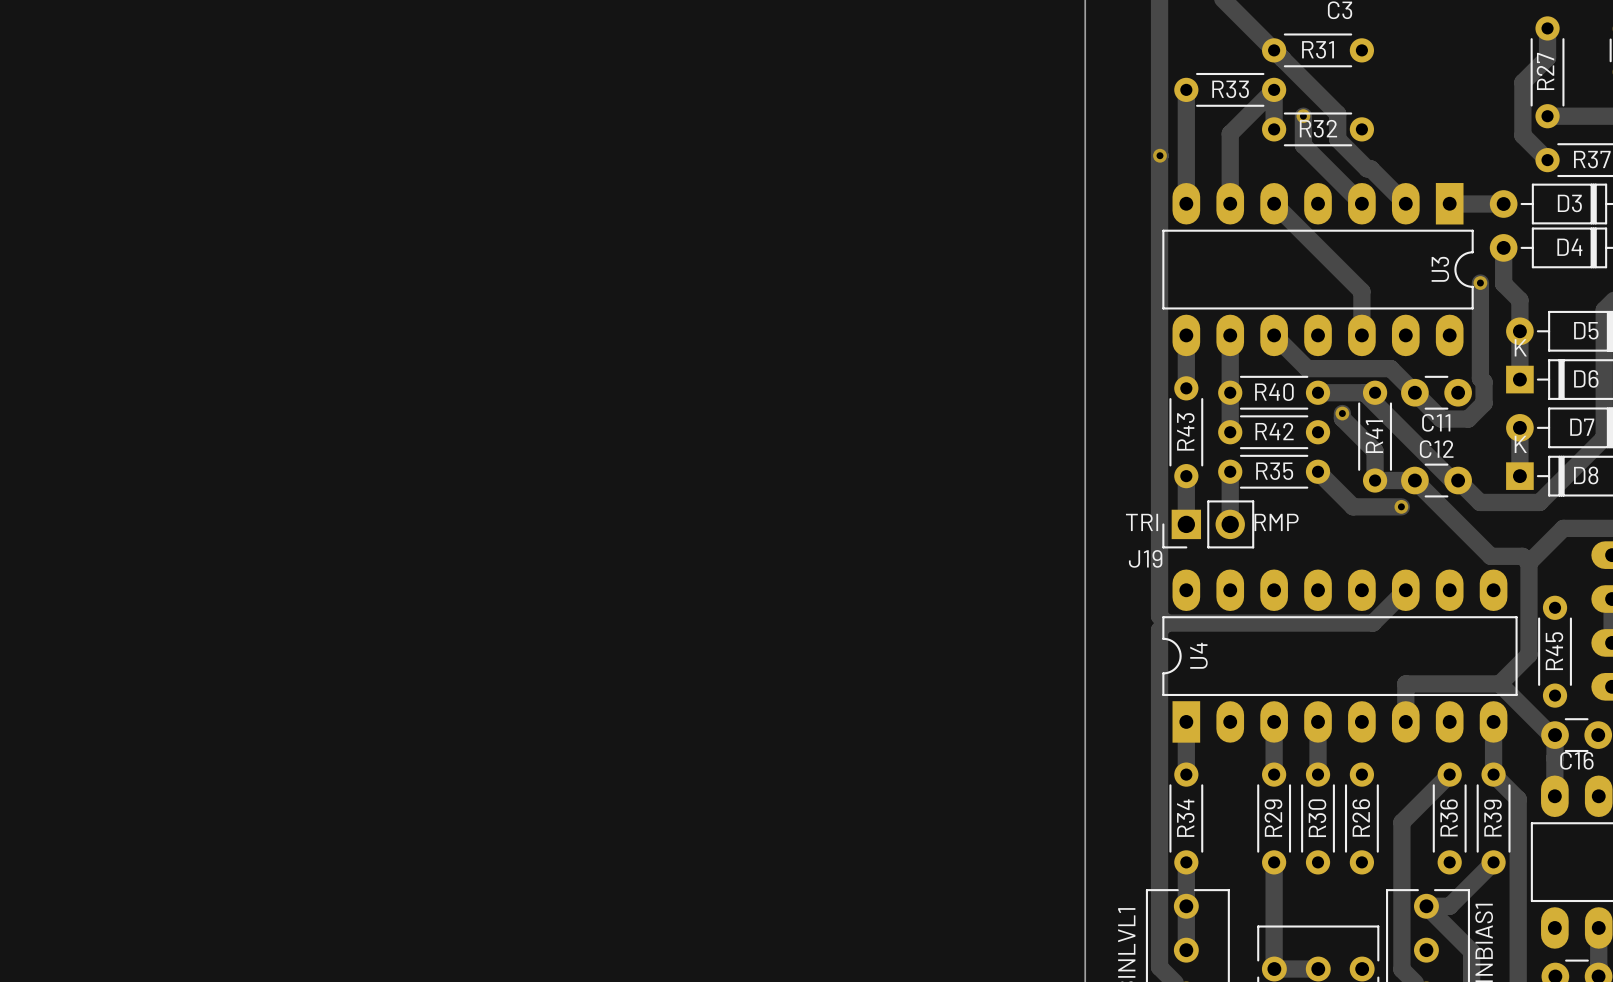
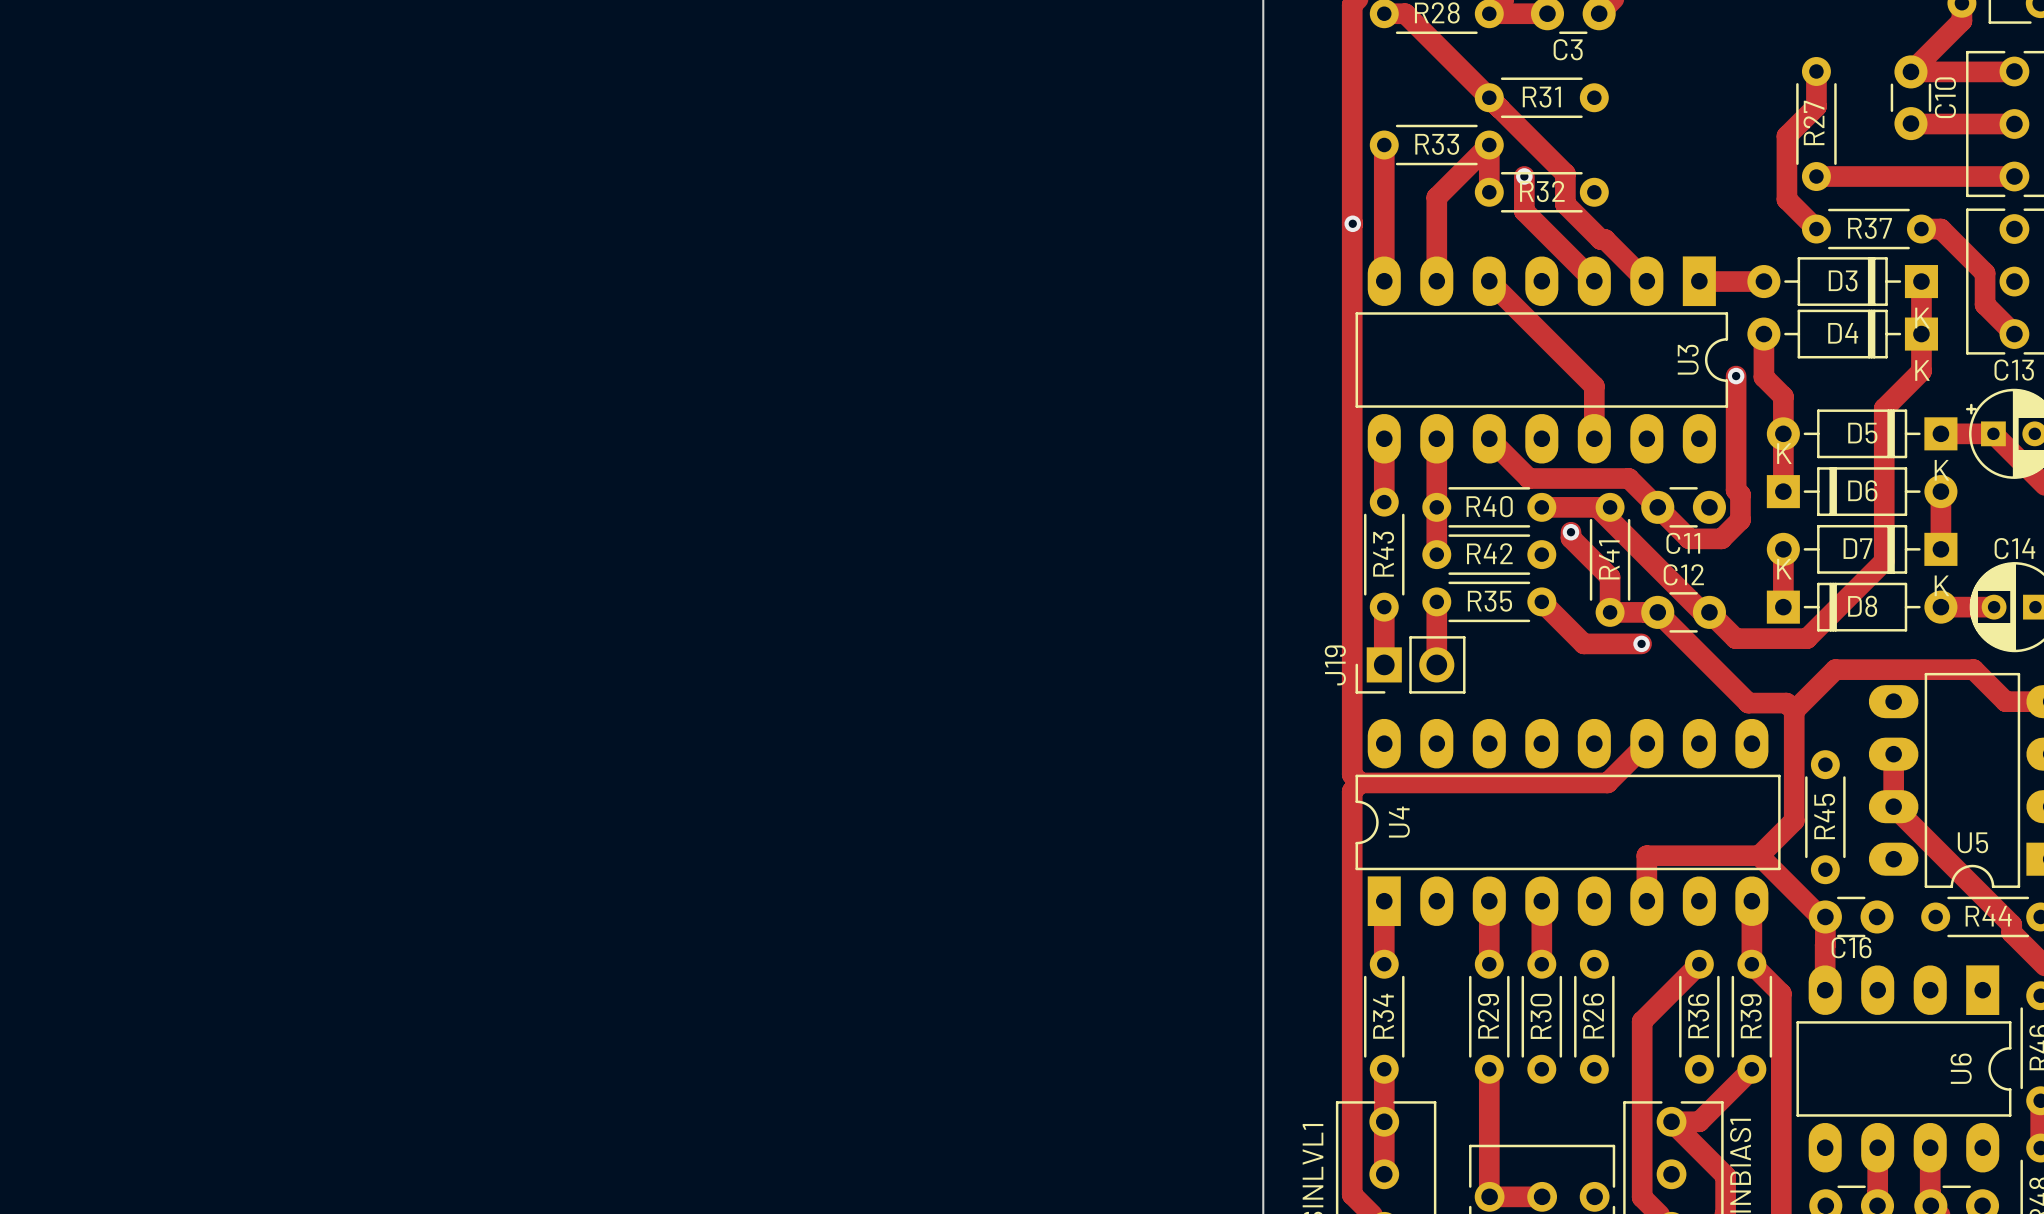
text: TRI (1142, 522) -> none
text: RMP (1276, 522) -> none
J19 name rotation: 0° (1145, 558) -> 90° counterclockwise (1335, 665)

